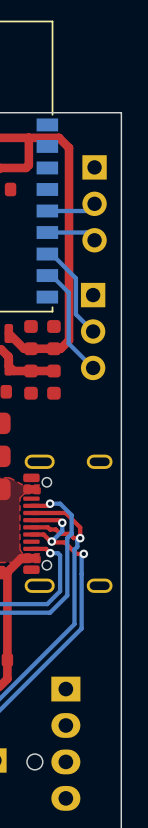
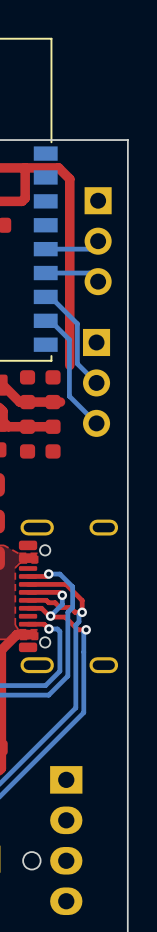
top track: (69, 315) (69, 340) (60, 348) -> none

